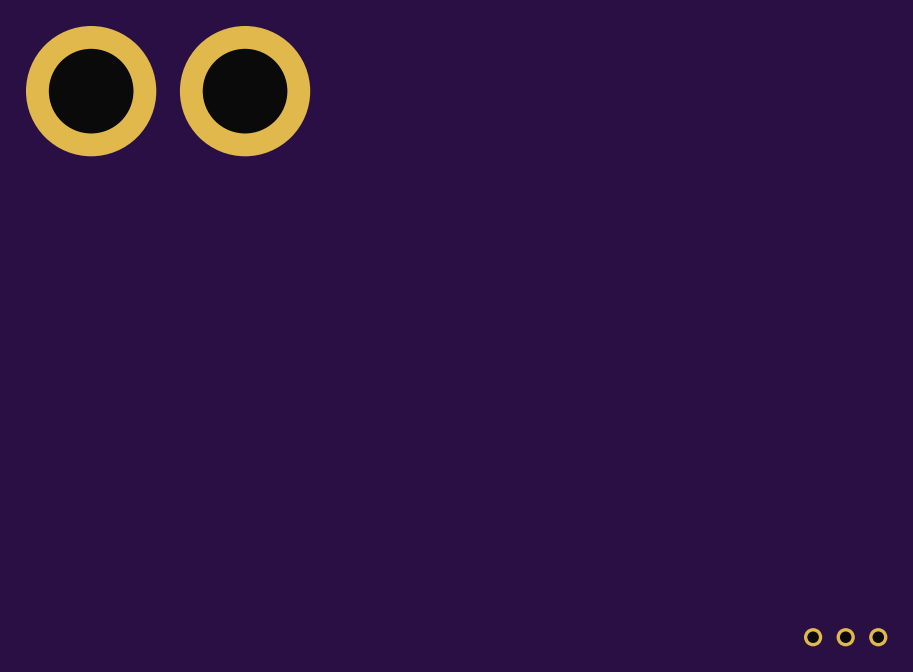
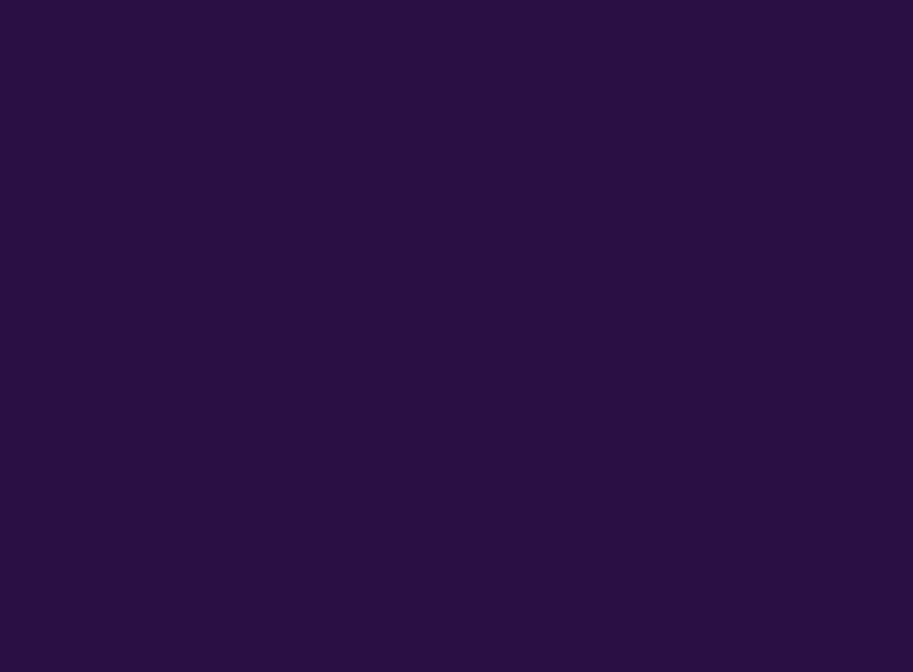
part: (168, 91) -> none
part: (845, 637) -> none

